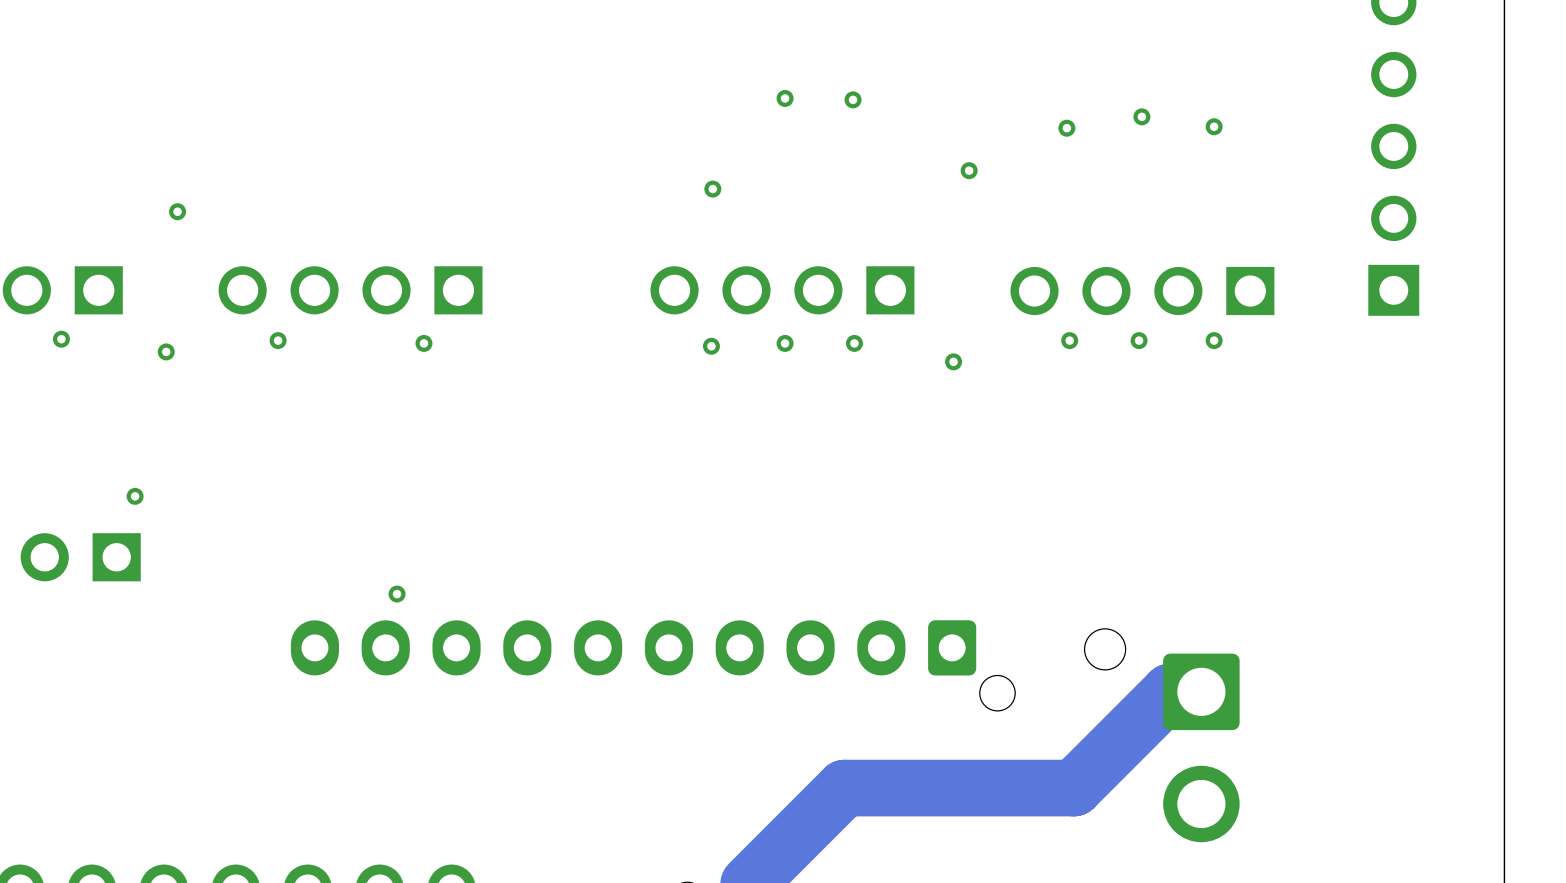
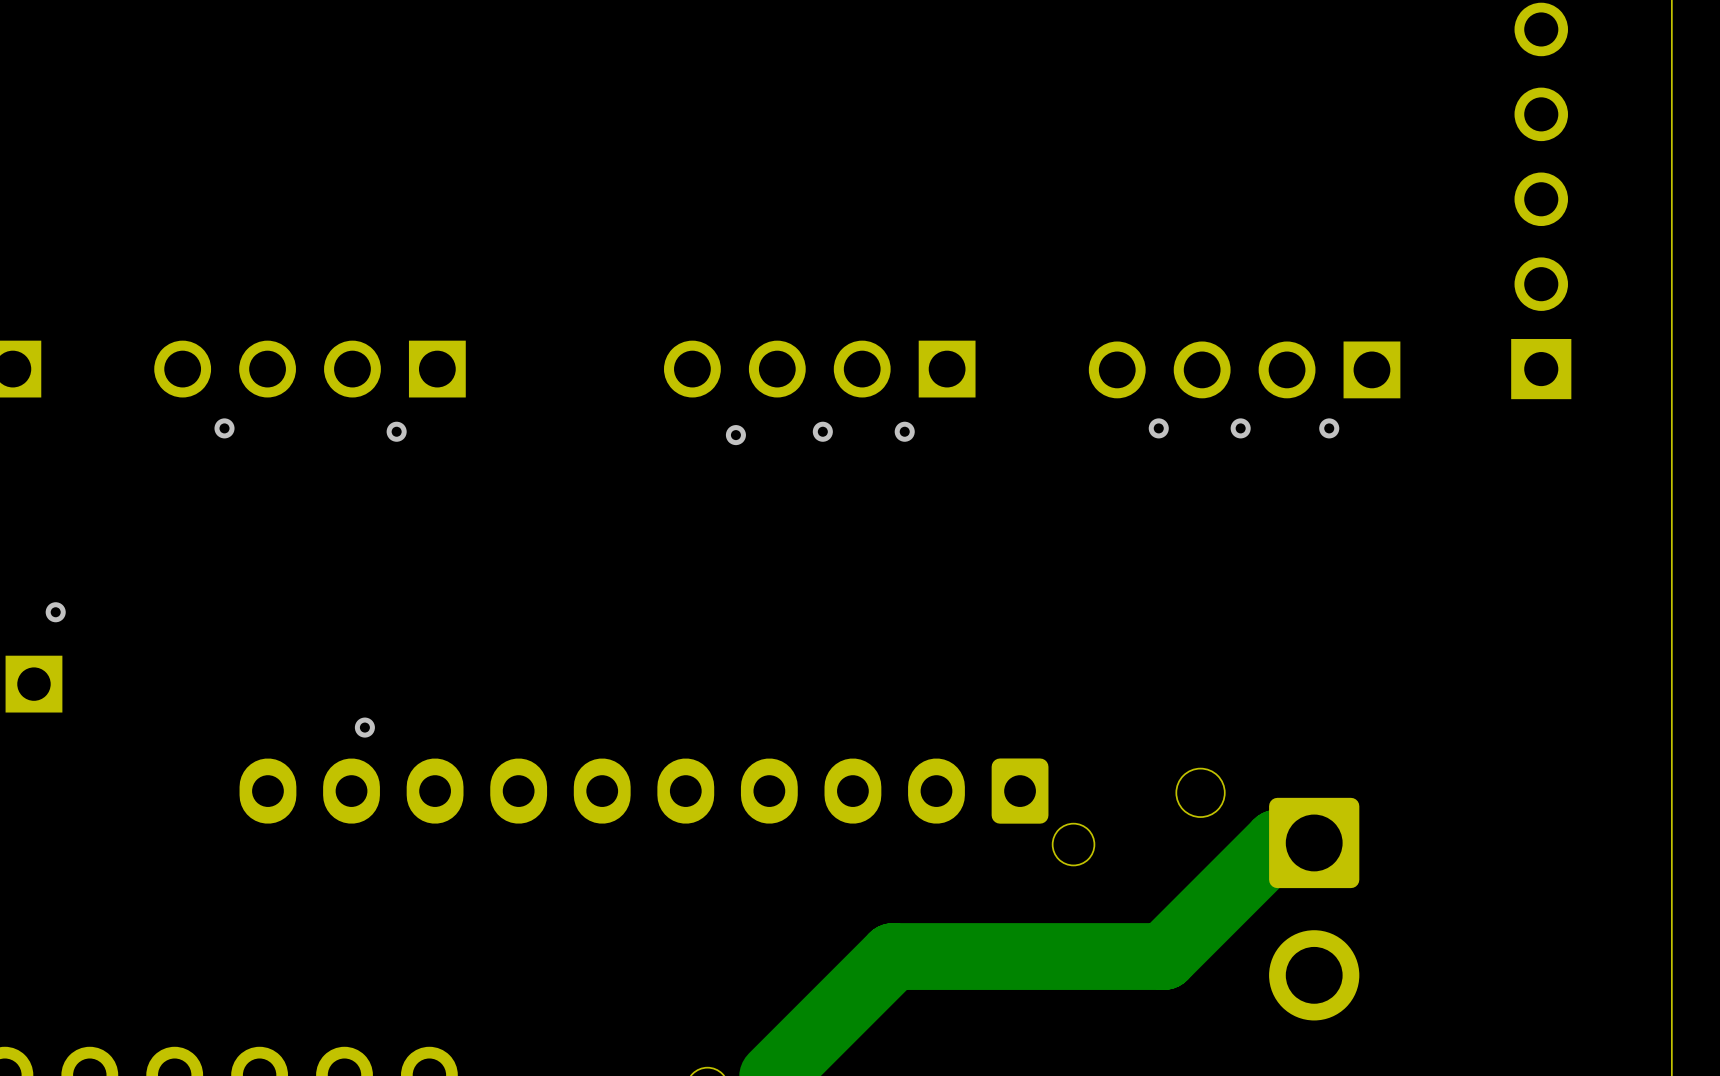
via: (785, 98) -> none
via: (853, 99) -> none
via: (1141, 116) -> none
via: (1214, 126) -> none
via: (1066, 128) -> none
via: (969, 170) -> none
via: (712, 189) -> none
via: (177, 211) -> none
via: (166, 351) -> none
via: (953, 361) -> none

